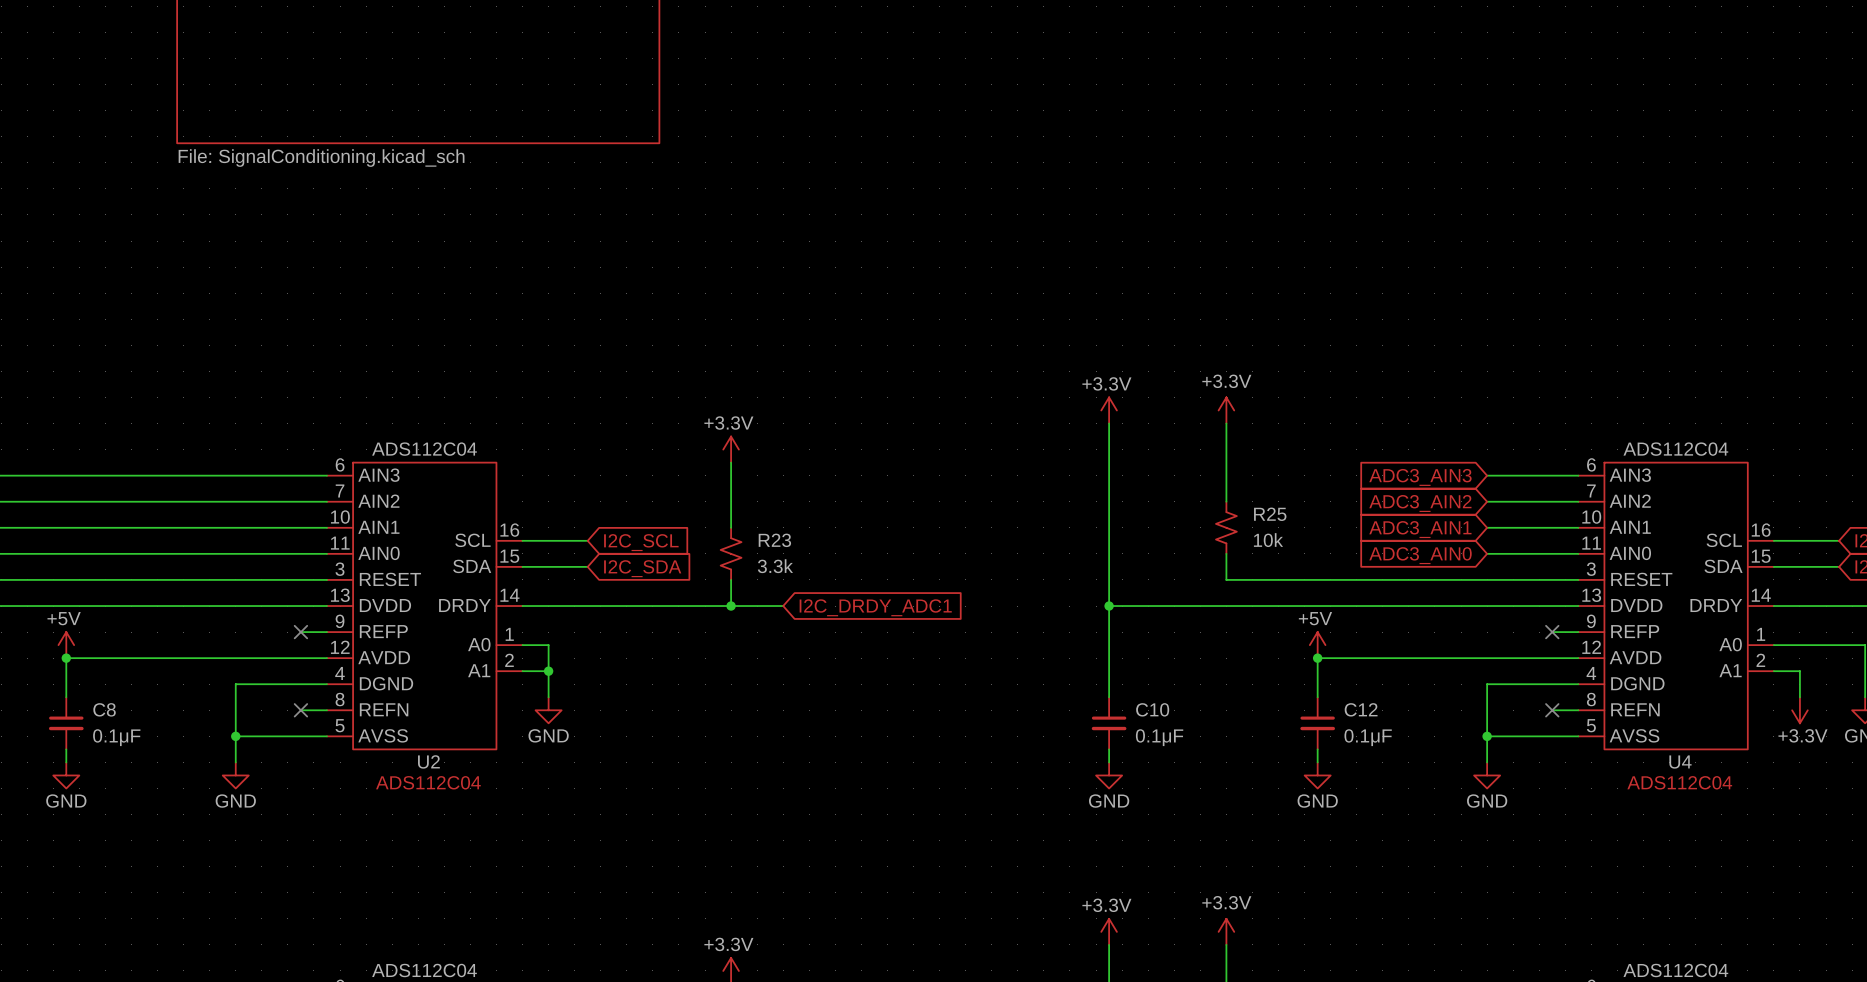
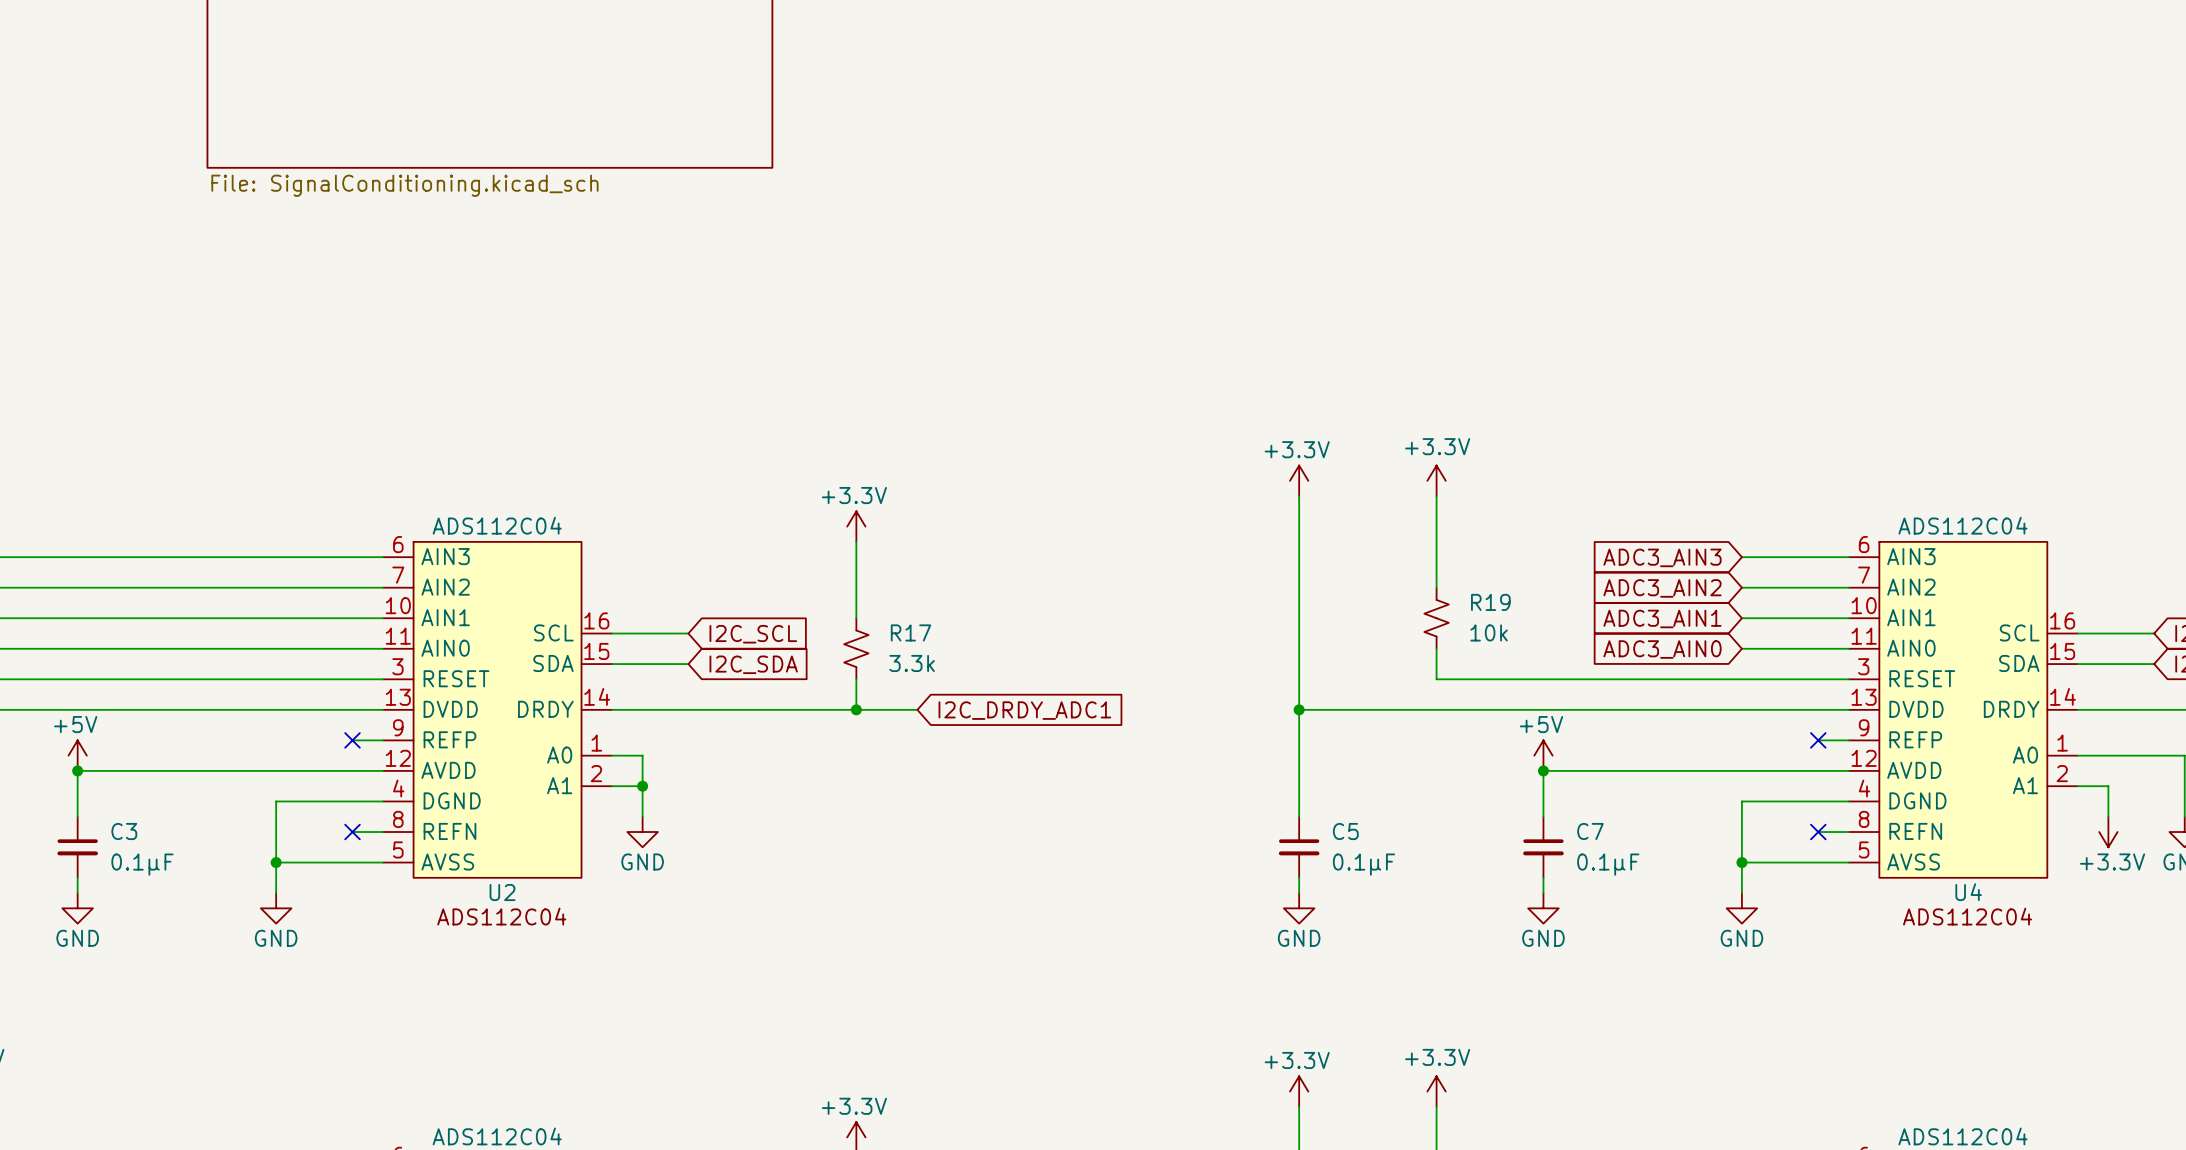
R25 name: R25 (1270, 514) -> R19 (1490, 602)
R23 name: R23 (774, 540) -> R17 (911, 632)
C8 name: C8 (104, 709) -> C3 (124, 831)
C10 name: C10 (1152, 709) -> C5 (1345, 831)
C12 name: C12 (1361, 709) -> C7 (1590, 831)

